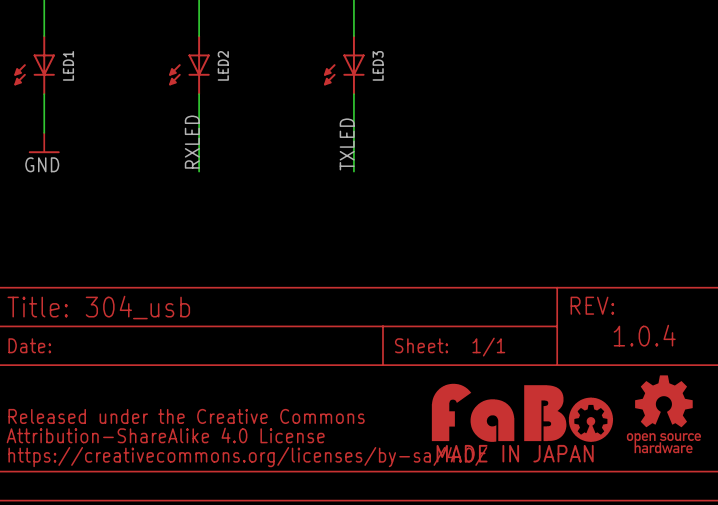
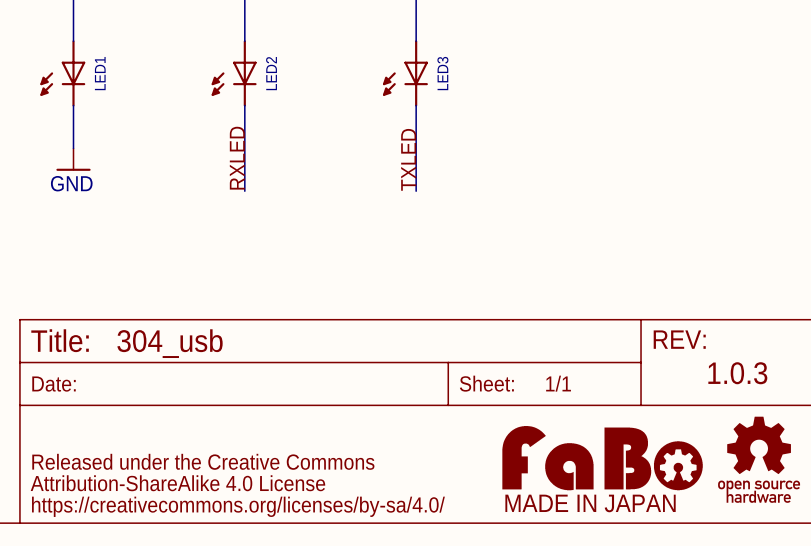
text: 1.0.4 (644, 335) -> 1.0.3 (737, 373)

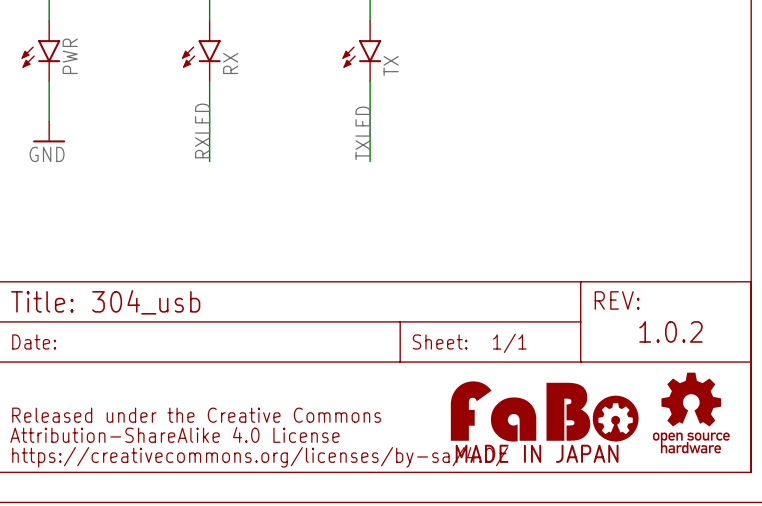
LED1: (62, 73) -> none
PWR: none -> (40, 51)
LED2: (234, 73) -> none
RX: none -> (201, 51)
LED3: (405, 73) -> none
TX: none -> (361, 51)
text: 1.0.3 (737, 373) -> 1.0.2 (670, 331)

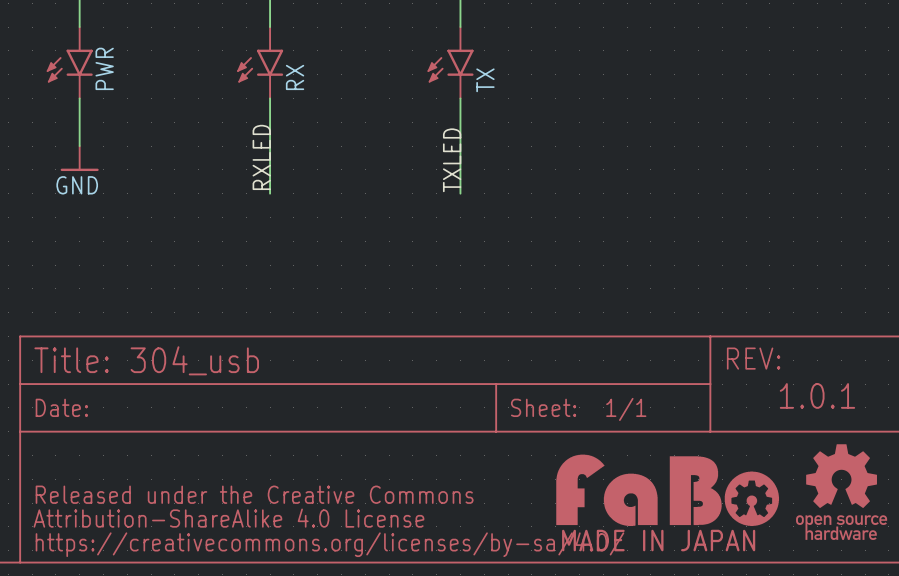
text: 1.0.2 (670, 331) -> 1.0.1 (817, 395)

